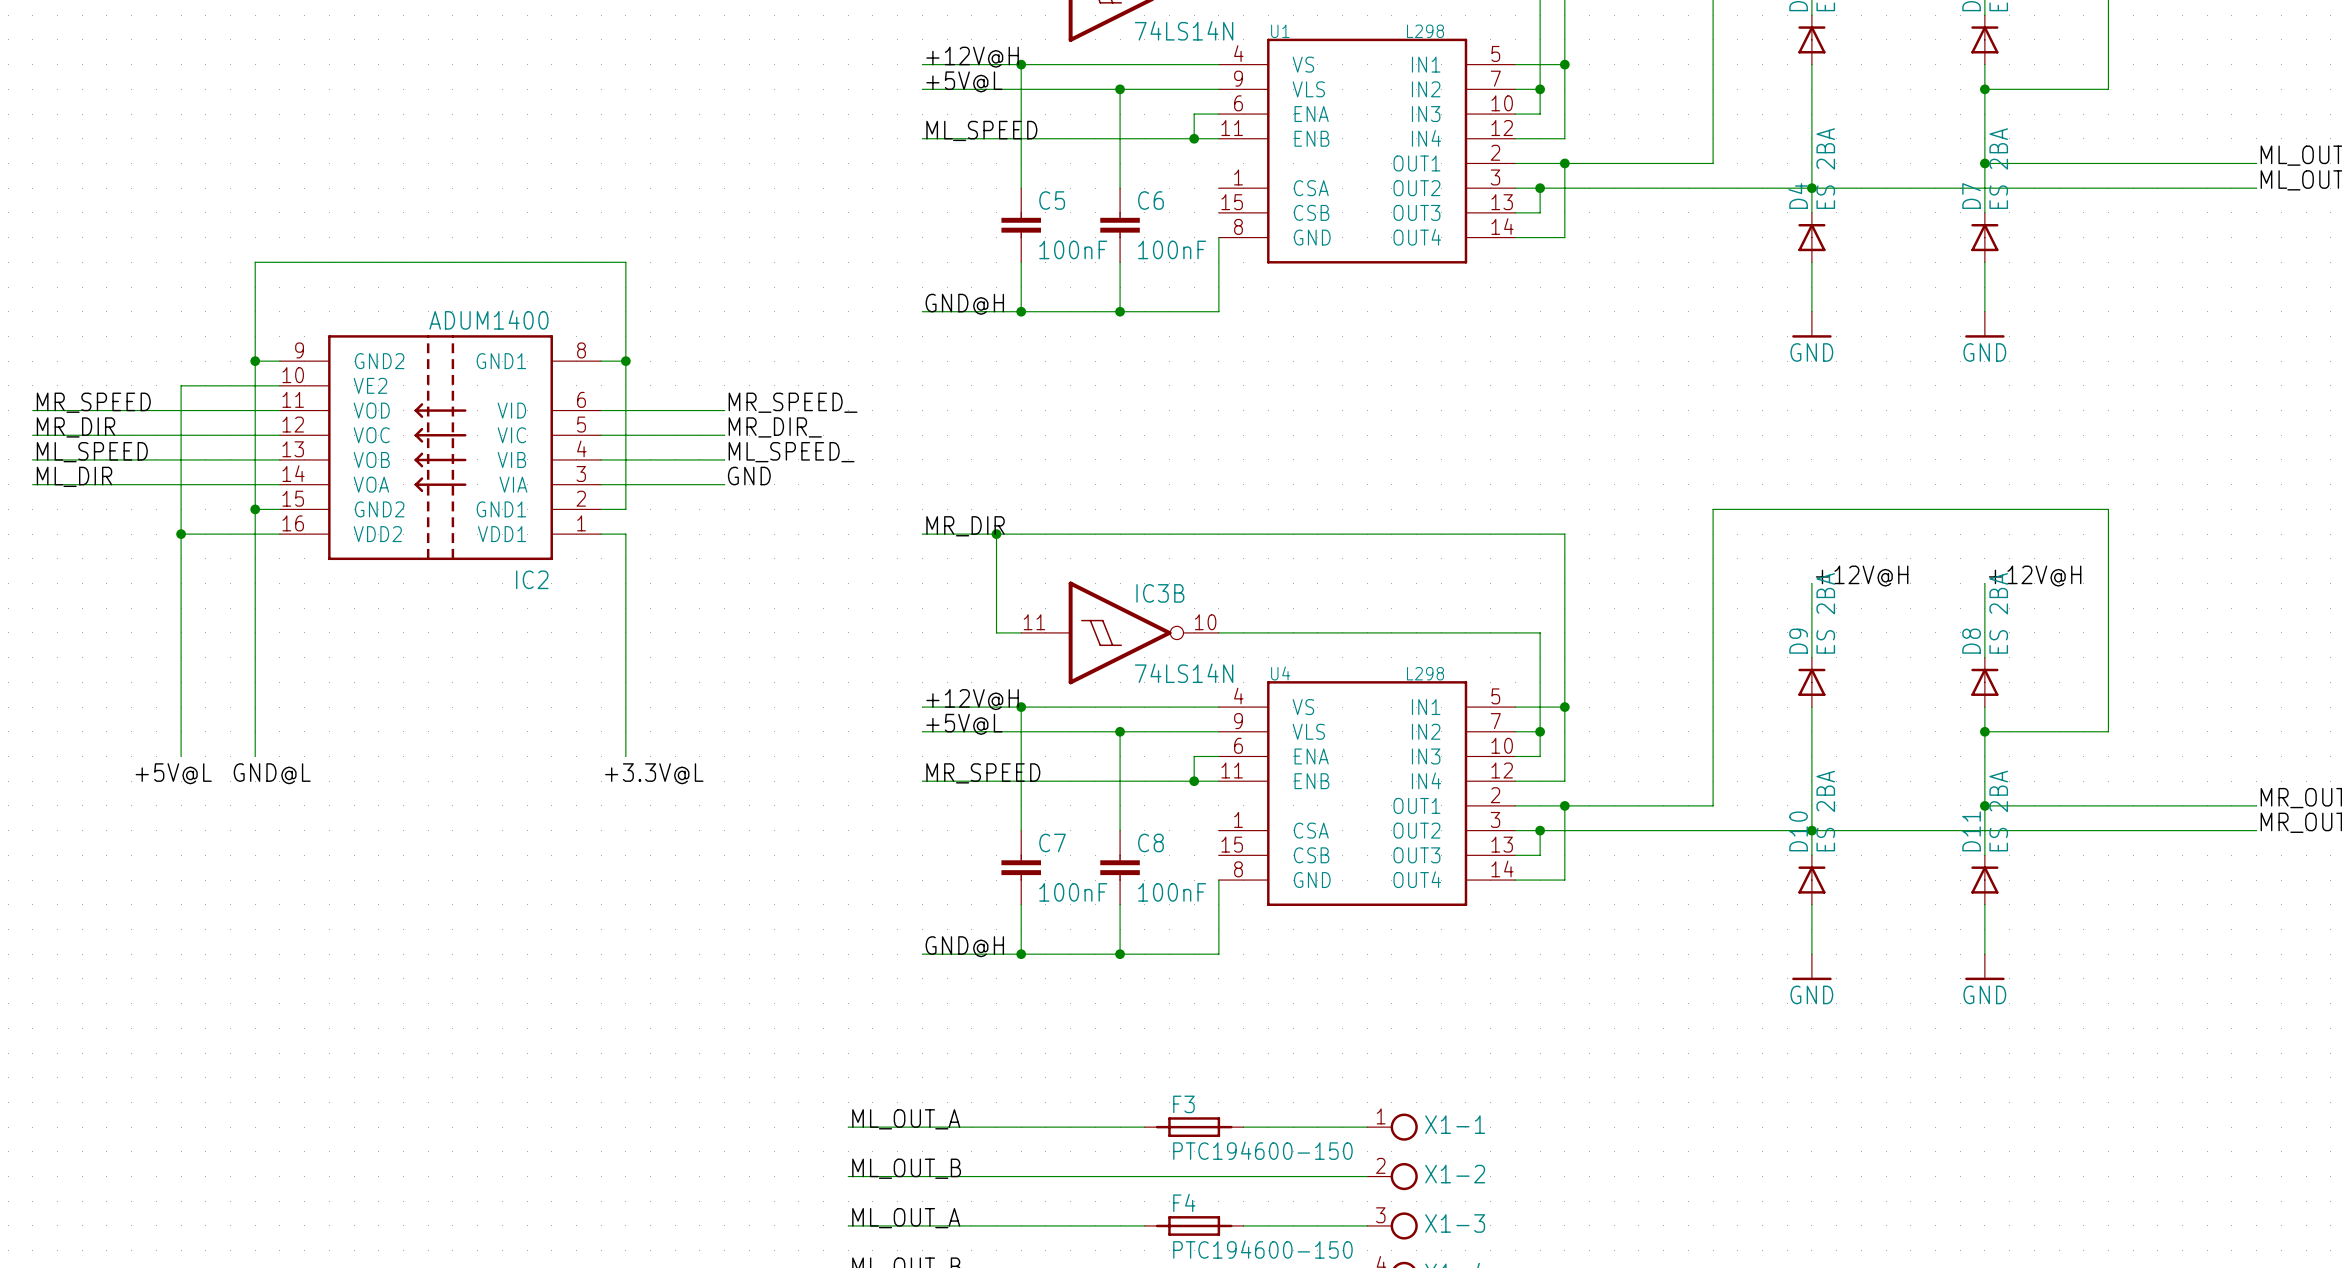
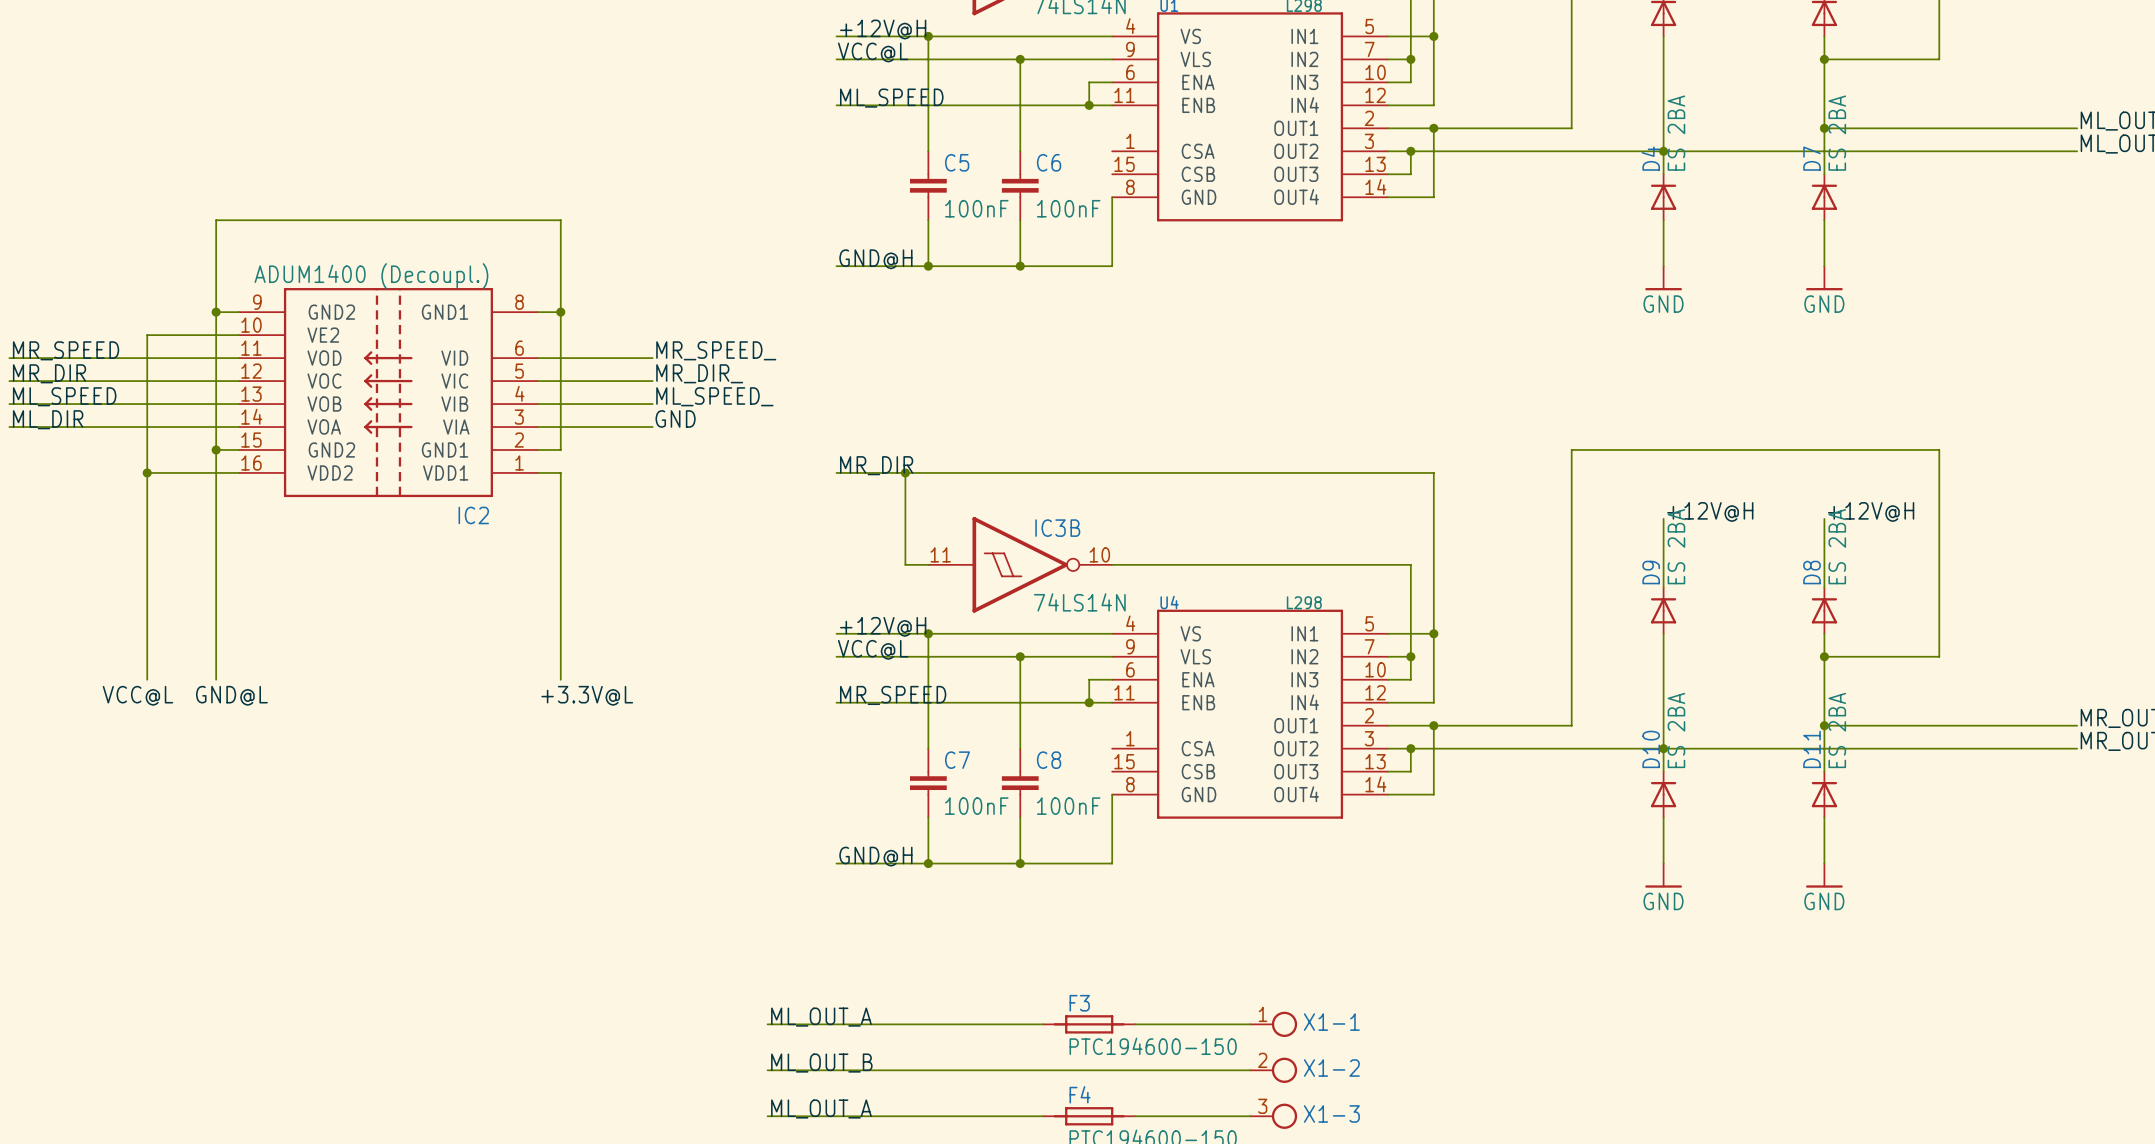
label: +5V@L (964, 81) -> VCC@L (873, 52)
IC2 value: ADUM1400 (488, 319) -> ADUM1400 (Decoupl.) (371, 276)
label: +5V@L (964, 724) -> VCC@L (873, 649)
label: +5V@L (173, 773) -> VCC@L (137, 695)

